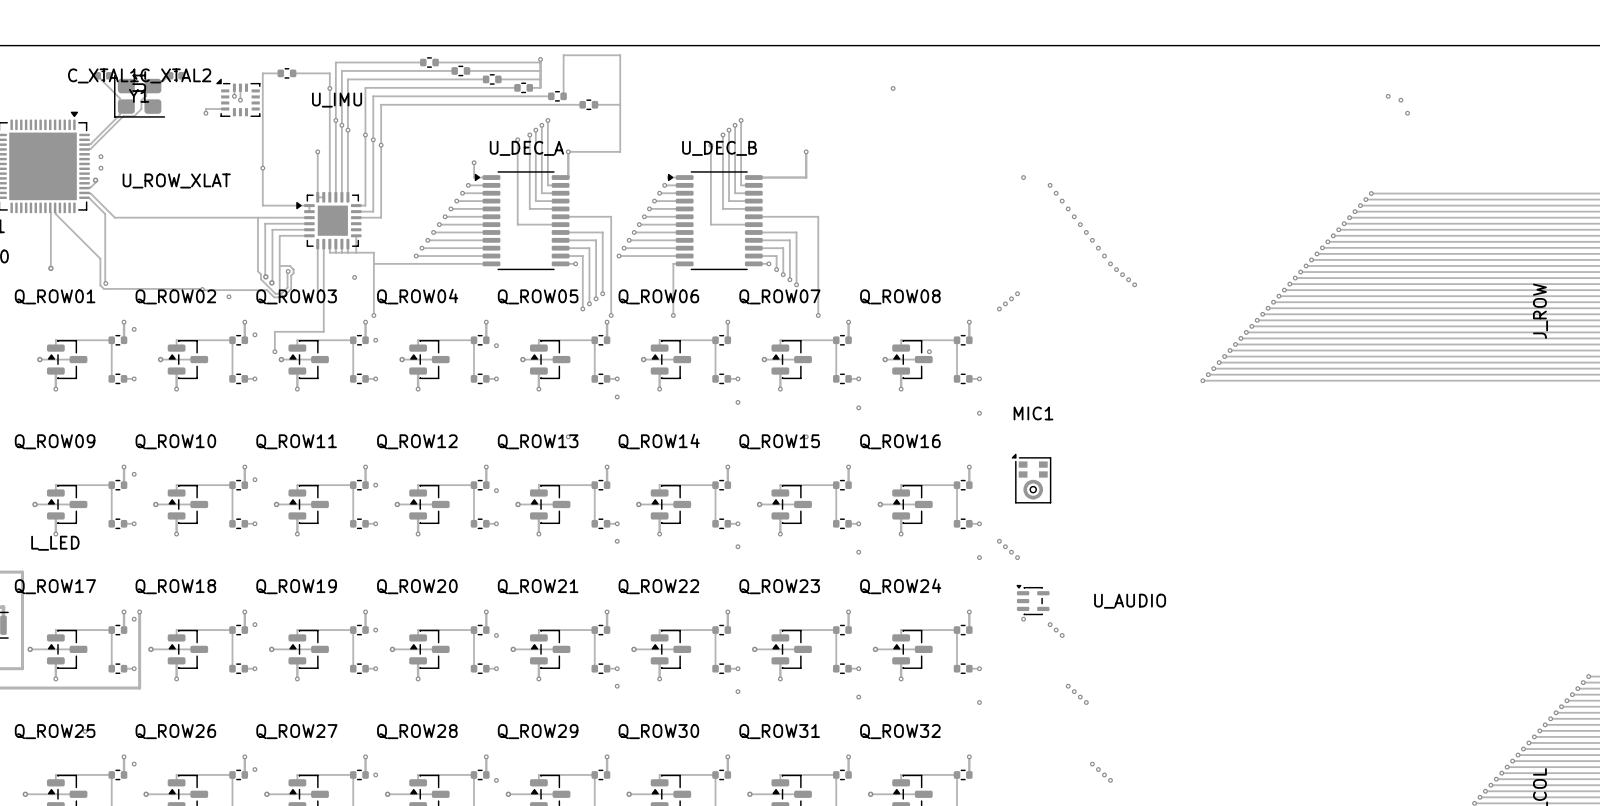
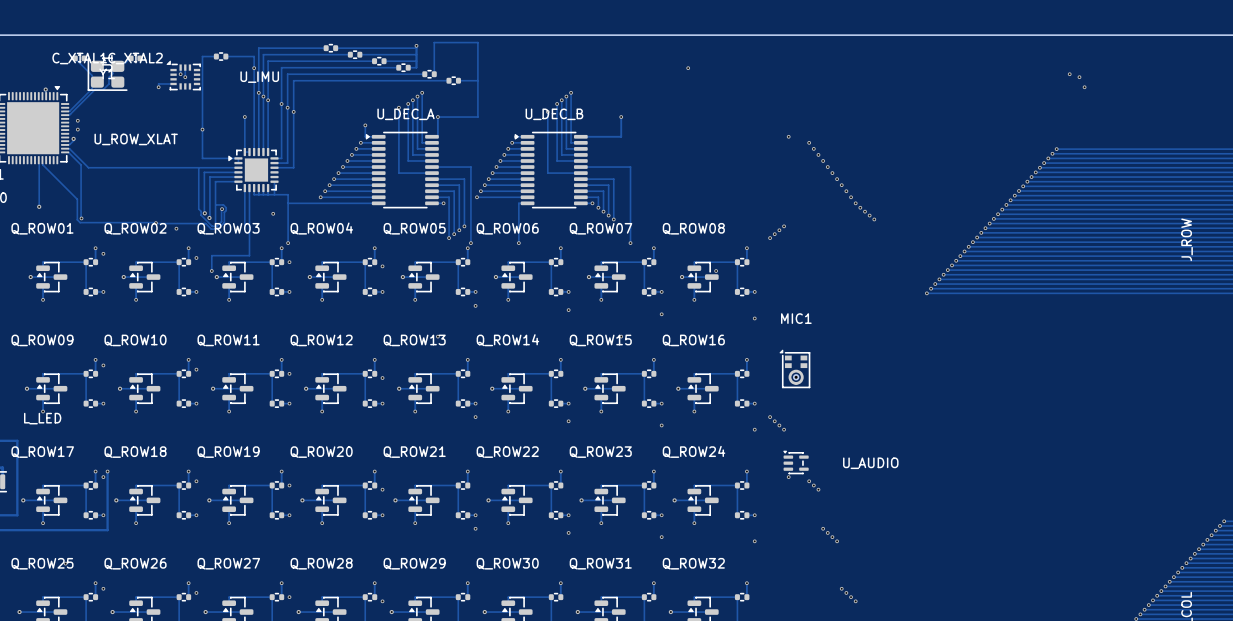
via: none -> (45, 89)

